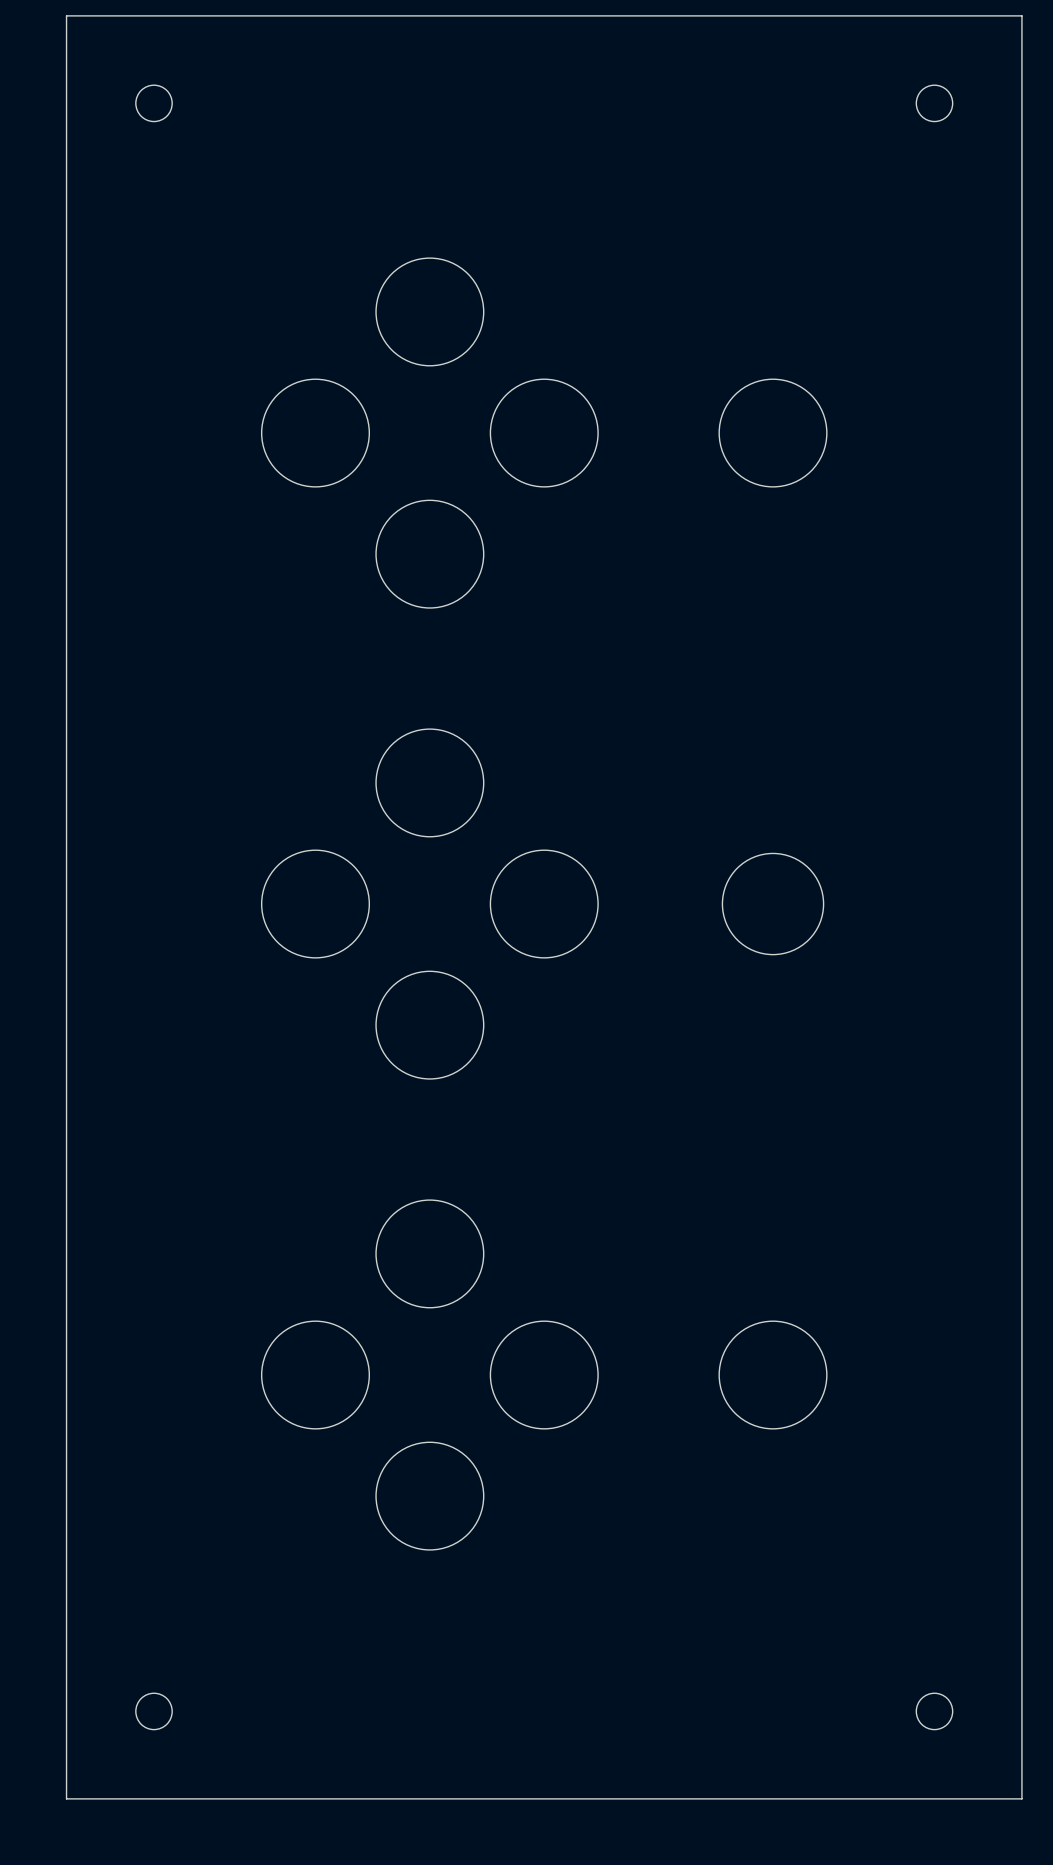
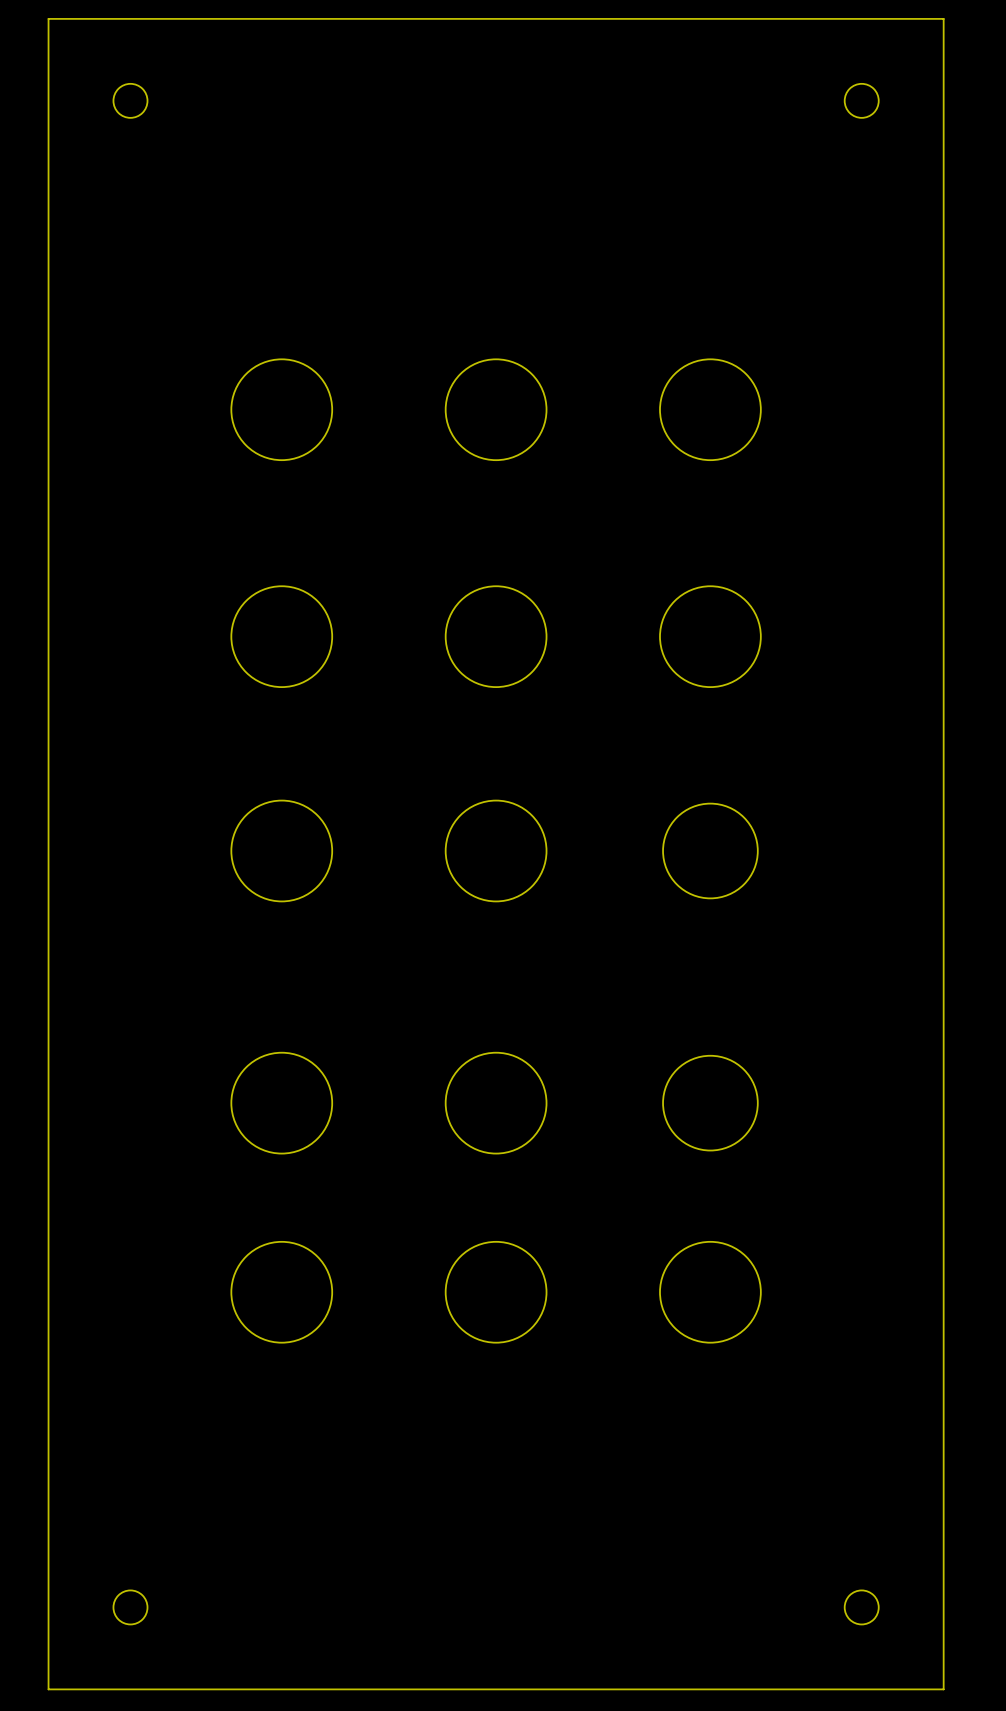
round board edge: [375, 257, 485, 367] -> none
round board edge: [375, 500, 485, 609] -> none
round board edge: none -> [231, 585, 333, 688]
round board edge: none -> [445, 585, 547, 688]
round board edge: none -> [659, 585, 762, 688]
round board edge: [375, 728, 485, 838] -> none
round board edge: [375, 970, 485, 1080] -> none
round board edge: none -> [231, 1052, 333, 1154]
round board edge: none -> [445, 1052, 547, 1154]
round board edge: none -> [662, 1055, 759, 1151]
round board edge: [375, 1199, 485, 1309] -> none
round board edge: [375, 1441, 485, 1551] -> none

